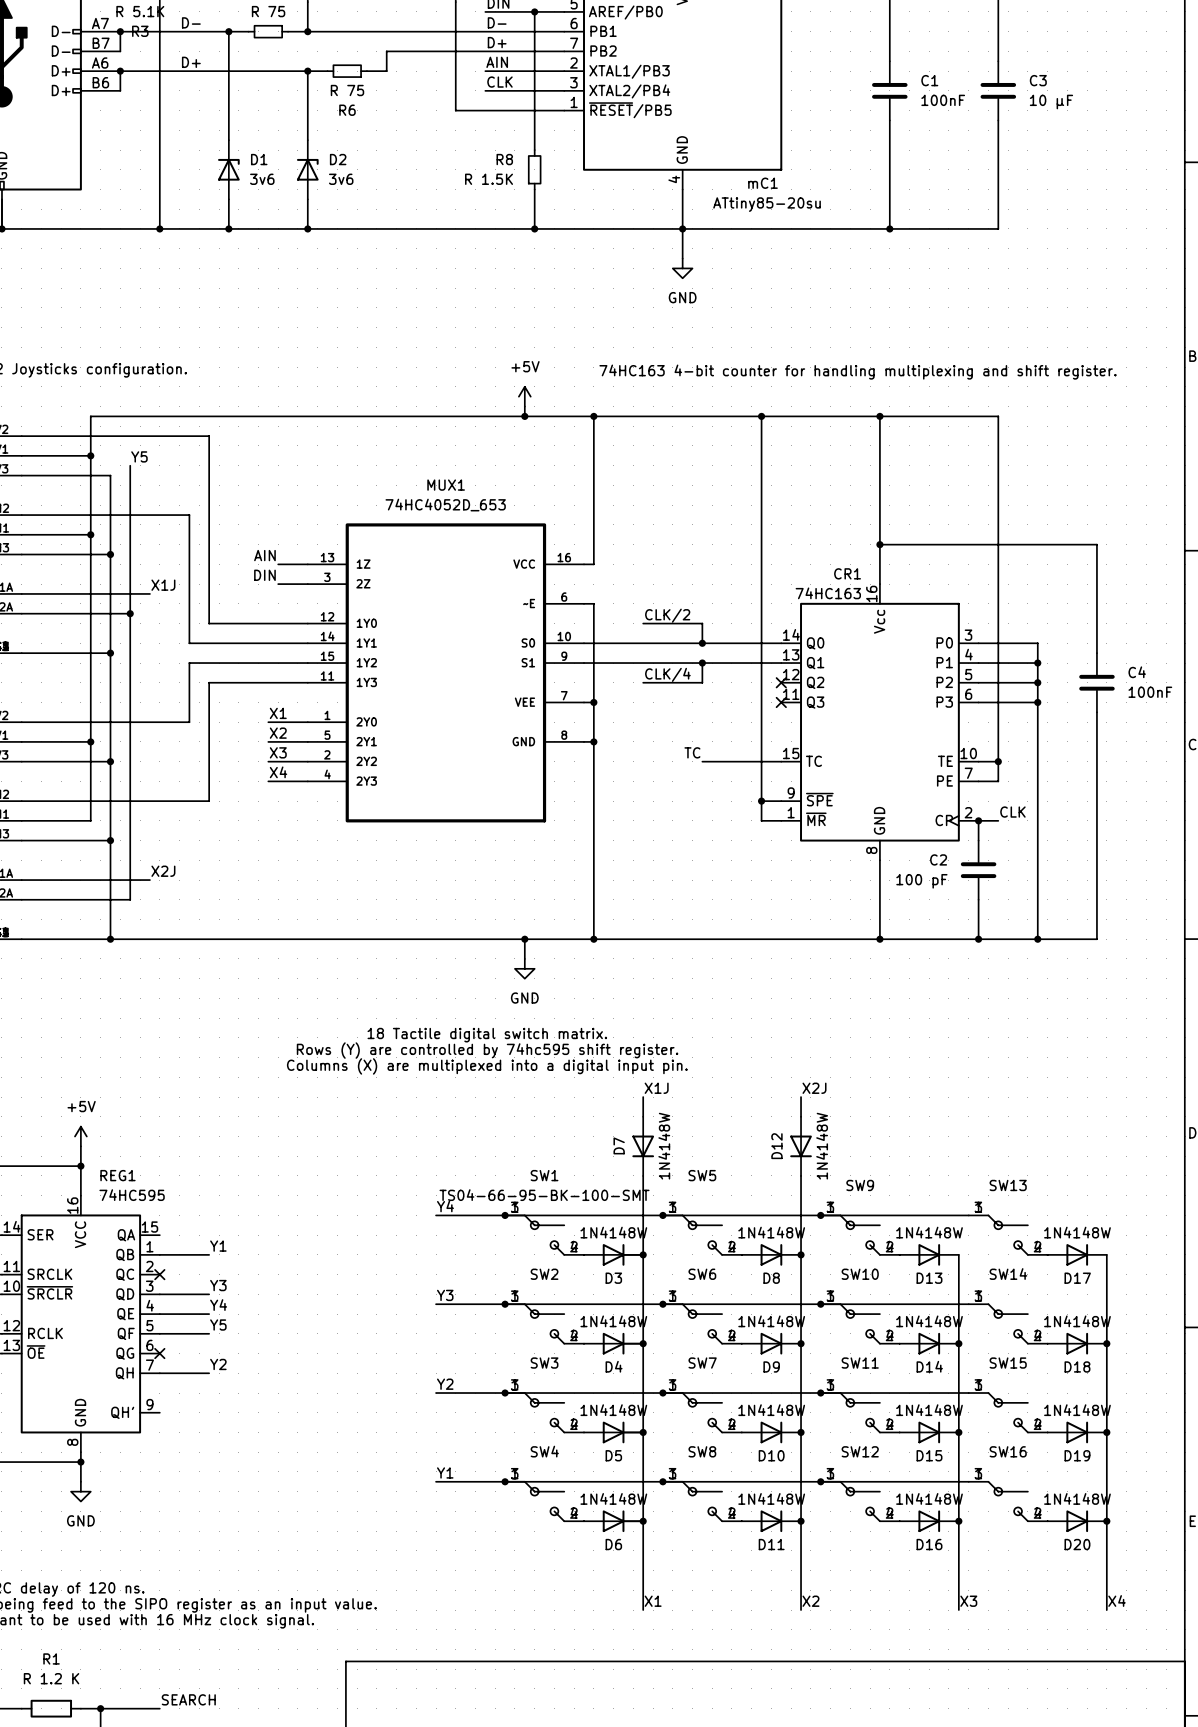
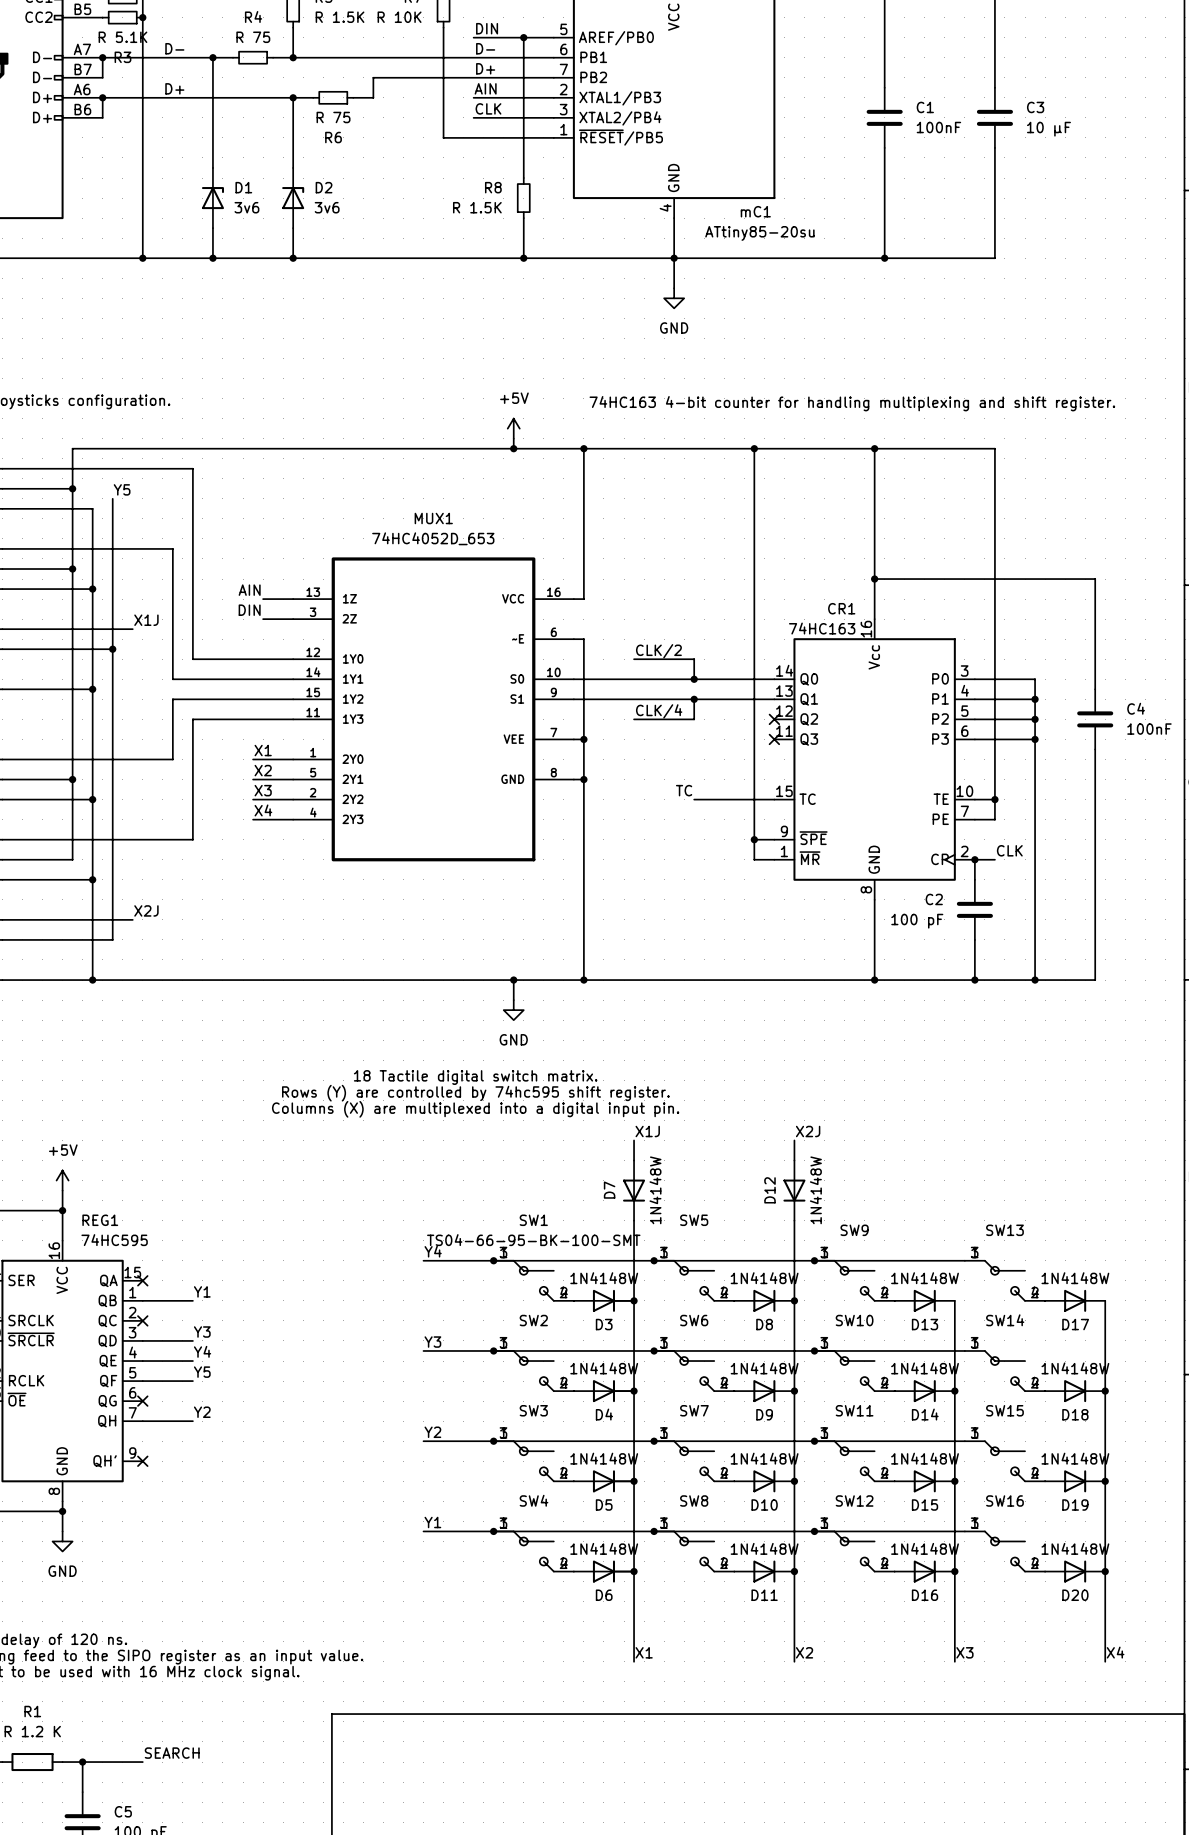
no-connect mark: none -> (142, 1280)
no-connect mark: none -> (142, 1461)

